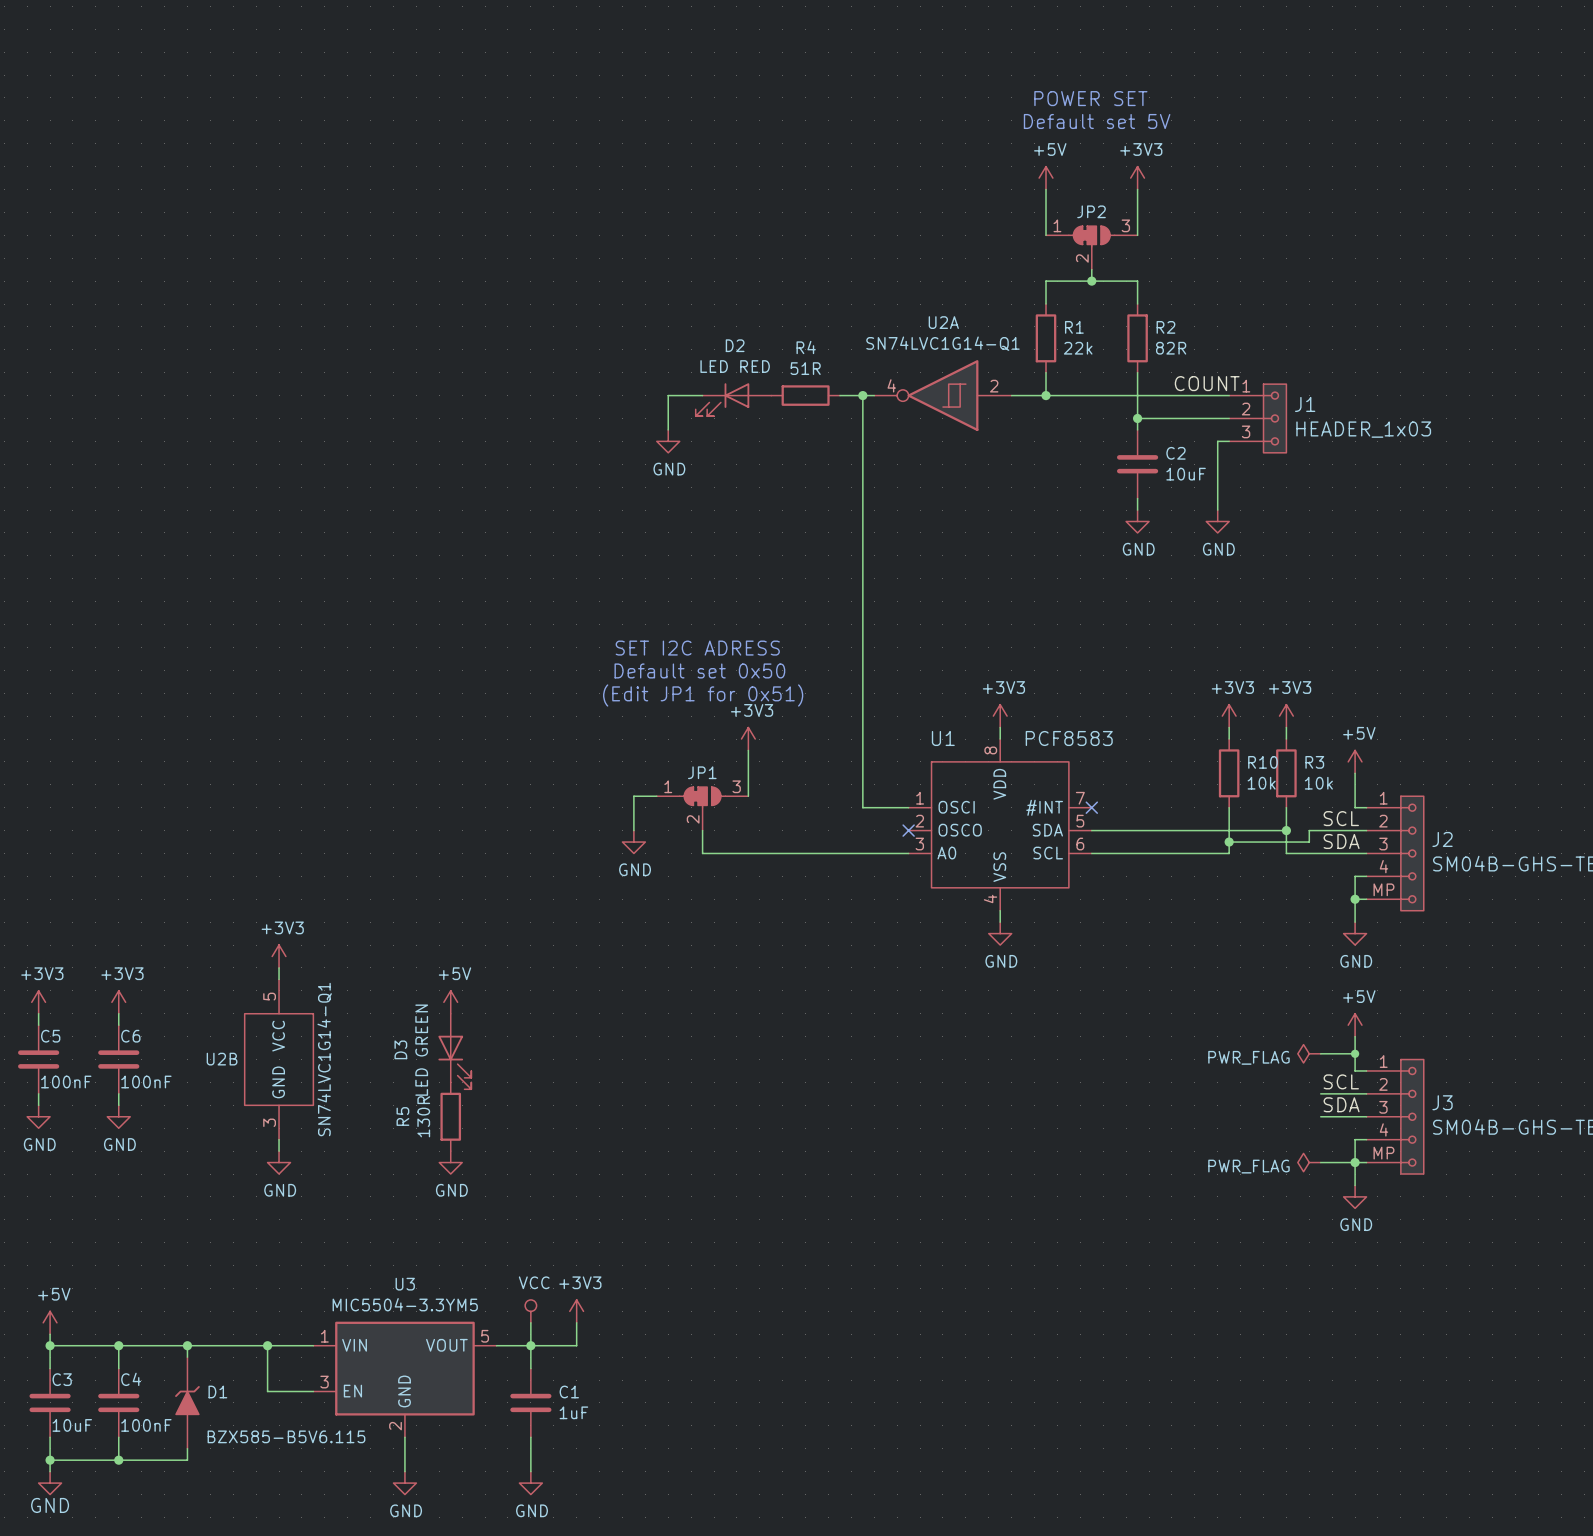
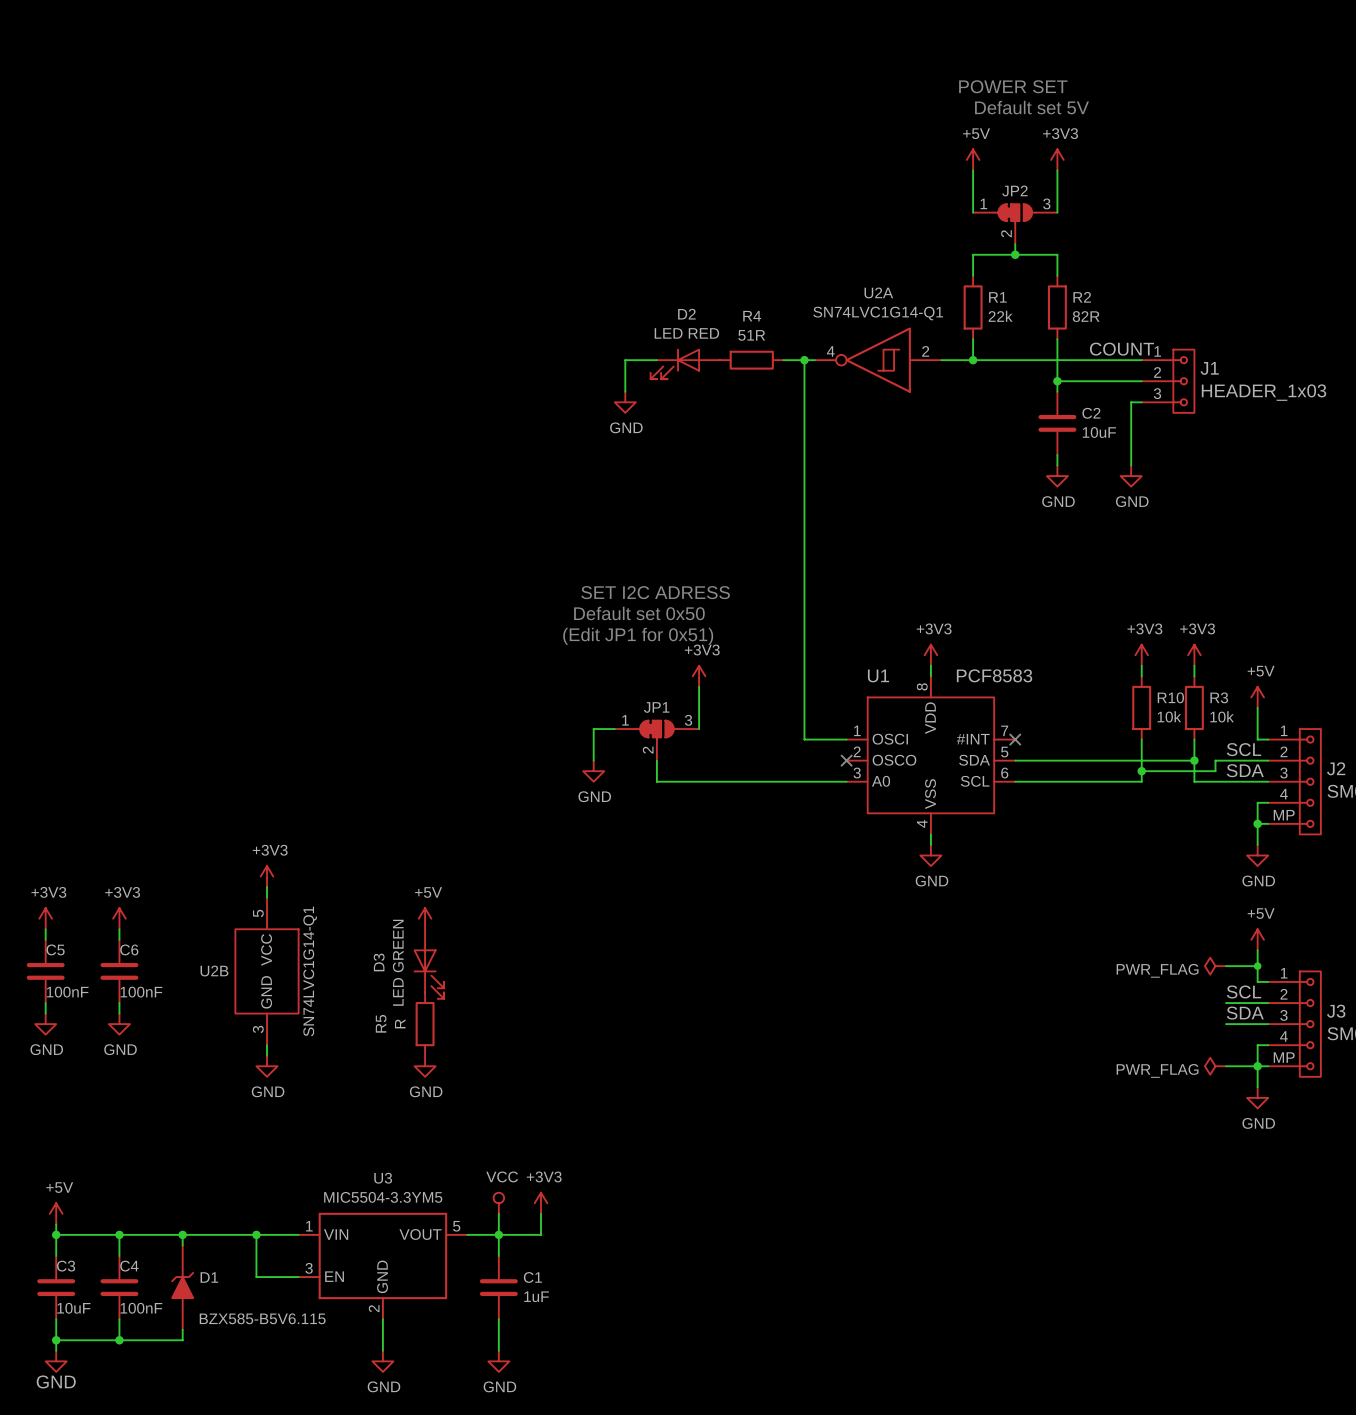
R5 value: 130R (423, 1116) -> R (400, 1023)

